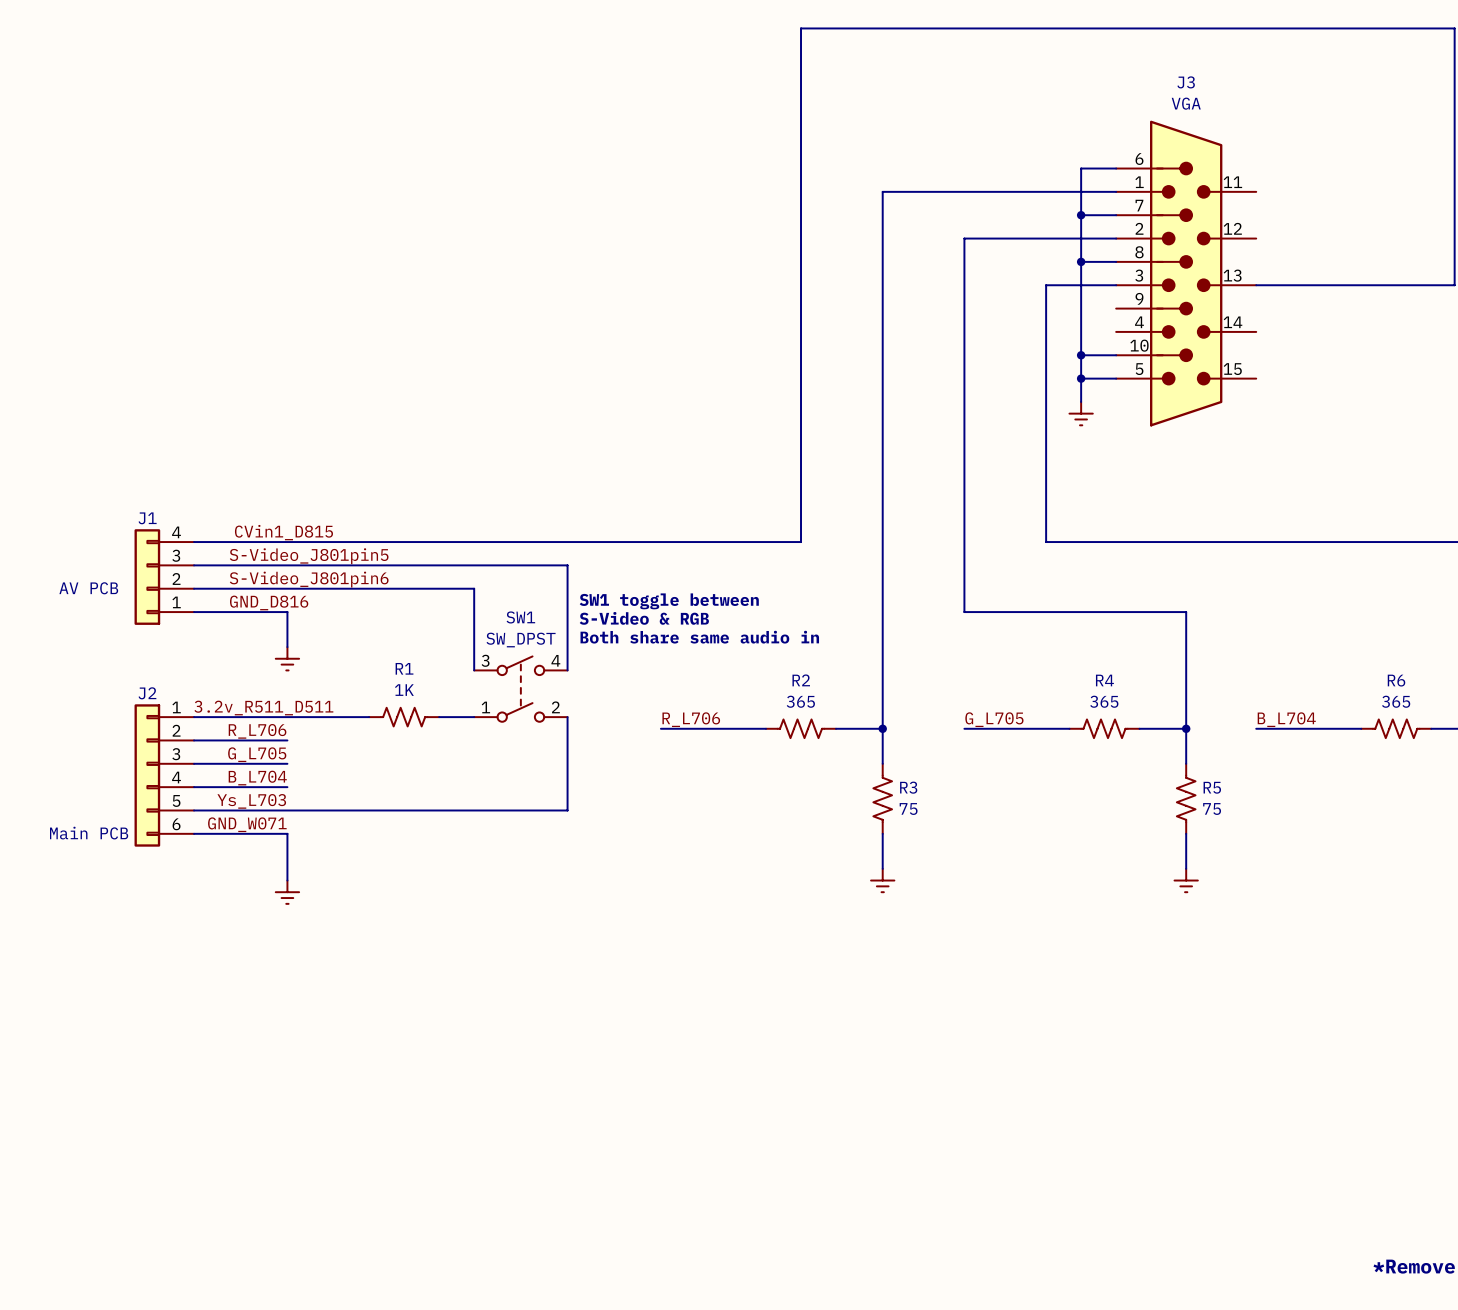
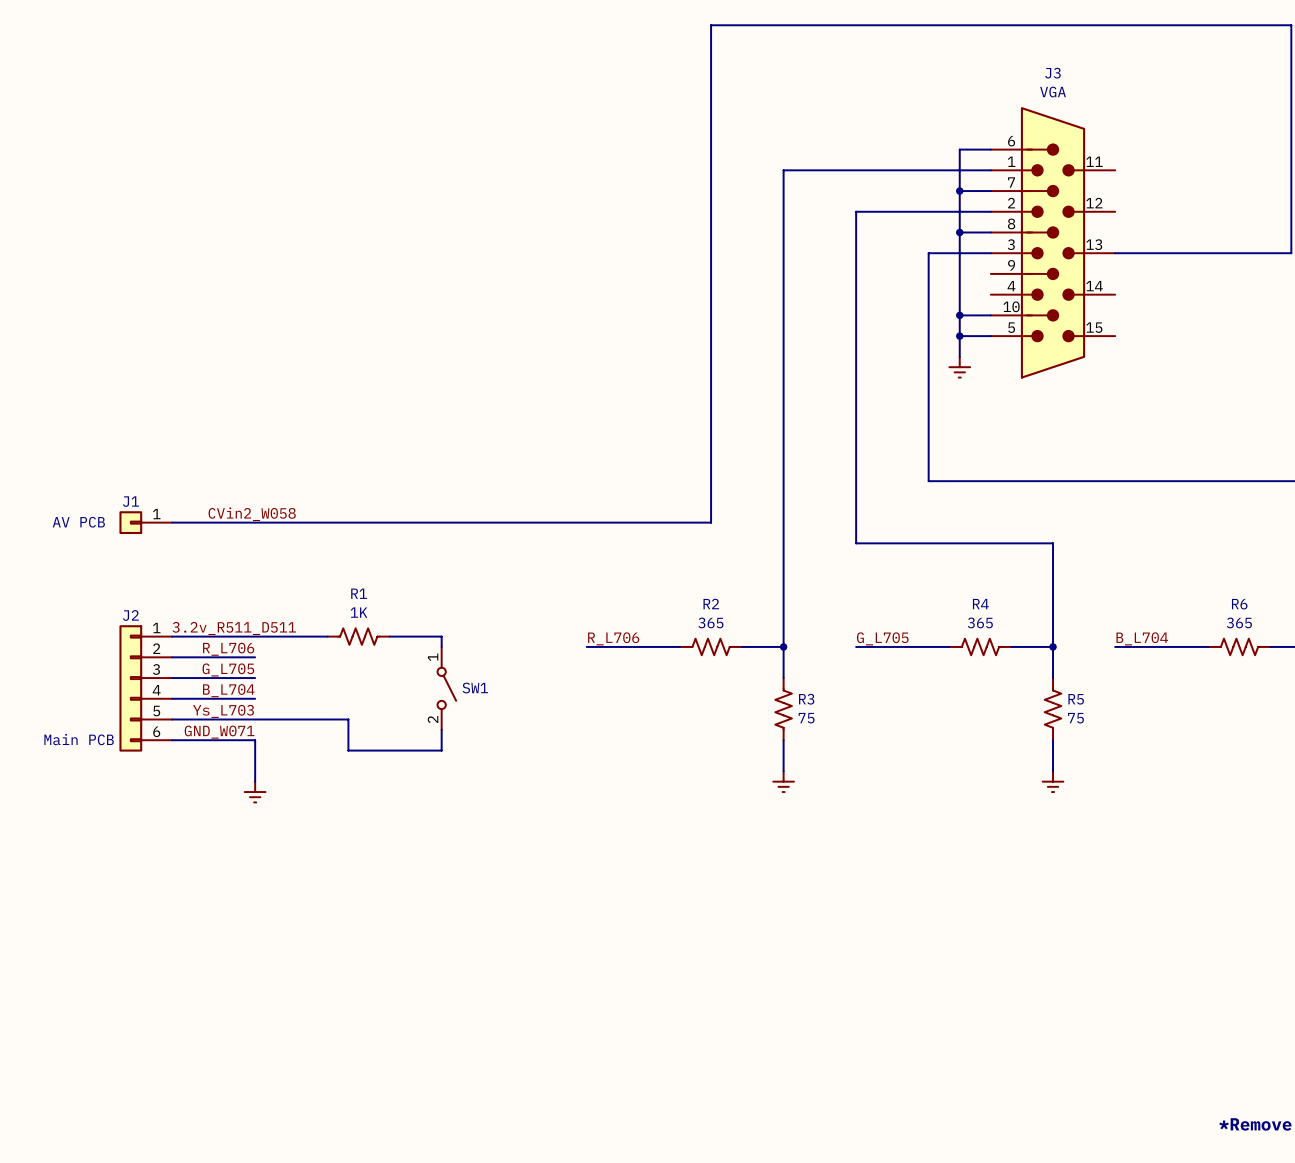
J1 name position: J1 (147, 518) -> J1 (131, 501)
J1 symbol: [134, 529, 195, 625] -> [119, 511, 173, 535]
label: CVin1_D815 (283, 532) -> none
wire: (194, 542) (801, 542) -> (420, 522) (711, 522) (711, 481)
label: S-Video_J801pin5 (309, 556) -> none
wire: (194, 565) (567, 565) (567, 670) -> none
label: none -> CVin2_W058 (252, 514)
label: S-Video_J801pin6 (309, 579) -> none
wire: (474, 588) (474, 670) -> none
text: SW1 toggle between (669, 601) -> none
label: GND_D816 (269, 602) -> none
wire: (194, 612) (287, 612) (287, 647) -> none
SW1 name position: SW1 (520, 617) -> SW1 (475, 688)
text: S-Video & RGB (644, 618) -> none
text: Both share same audio in (699, 637) -> none
SW1 value: SW_DPST (521, 640) -> none
SW1 symbol: [474, 656, 568, 722] -> [437, 646, 457, 730]
power symbol: (287, 658) -> none
wire: (567, 717) (567, 810) (392, 810) -> (441, 729) (441, 750) (348, 750) (348, 719)

